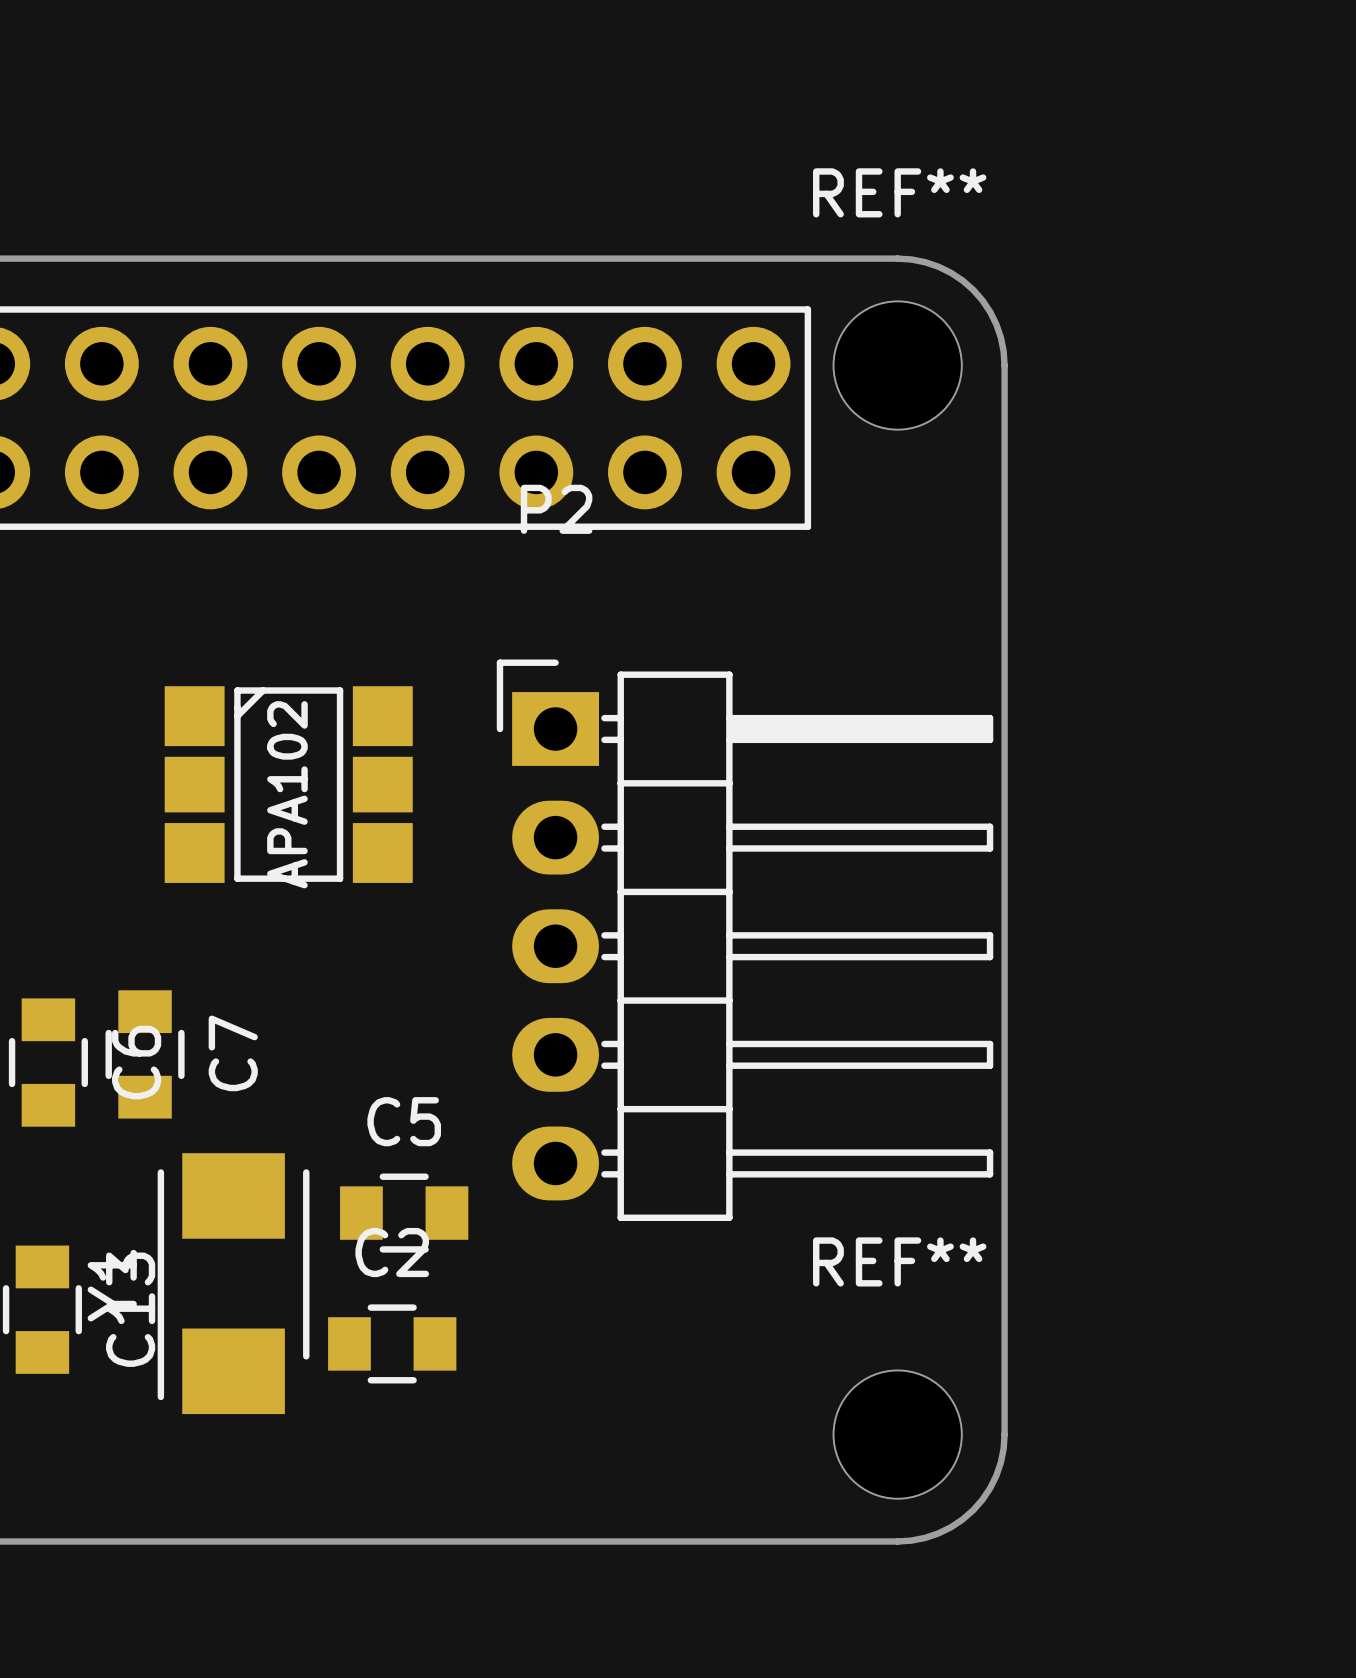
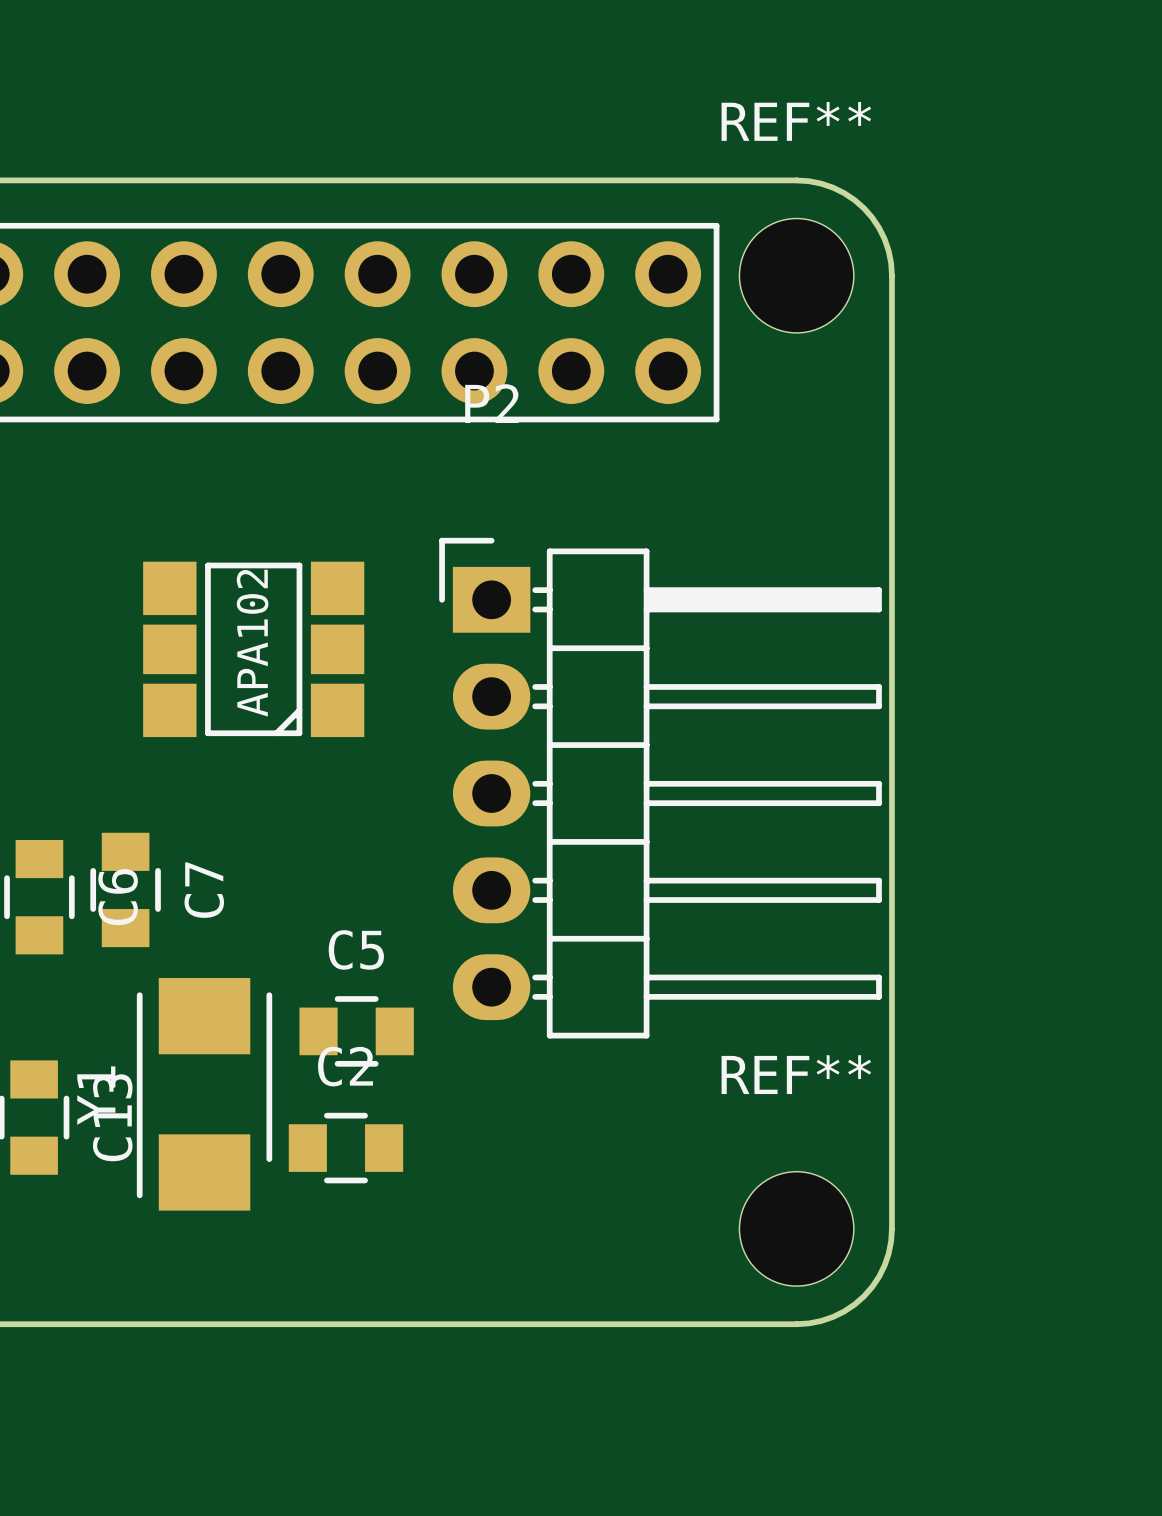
part rotation: 0° (288, 784) -> 180° (253, 649)

